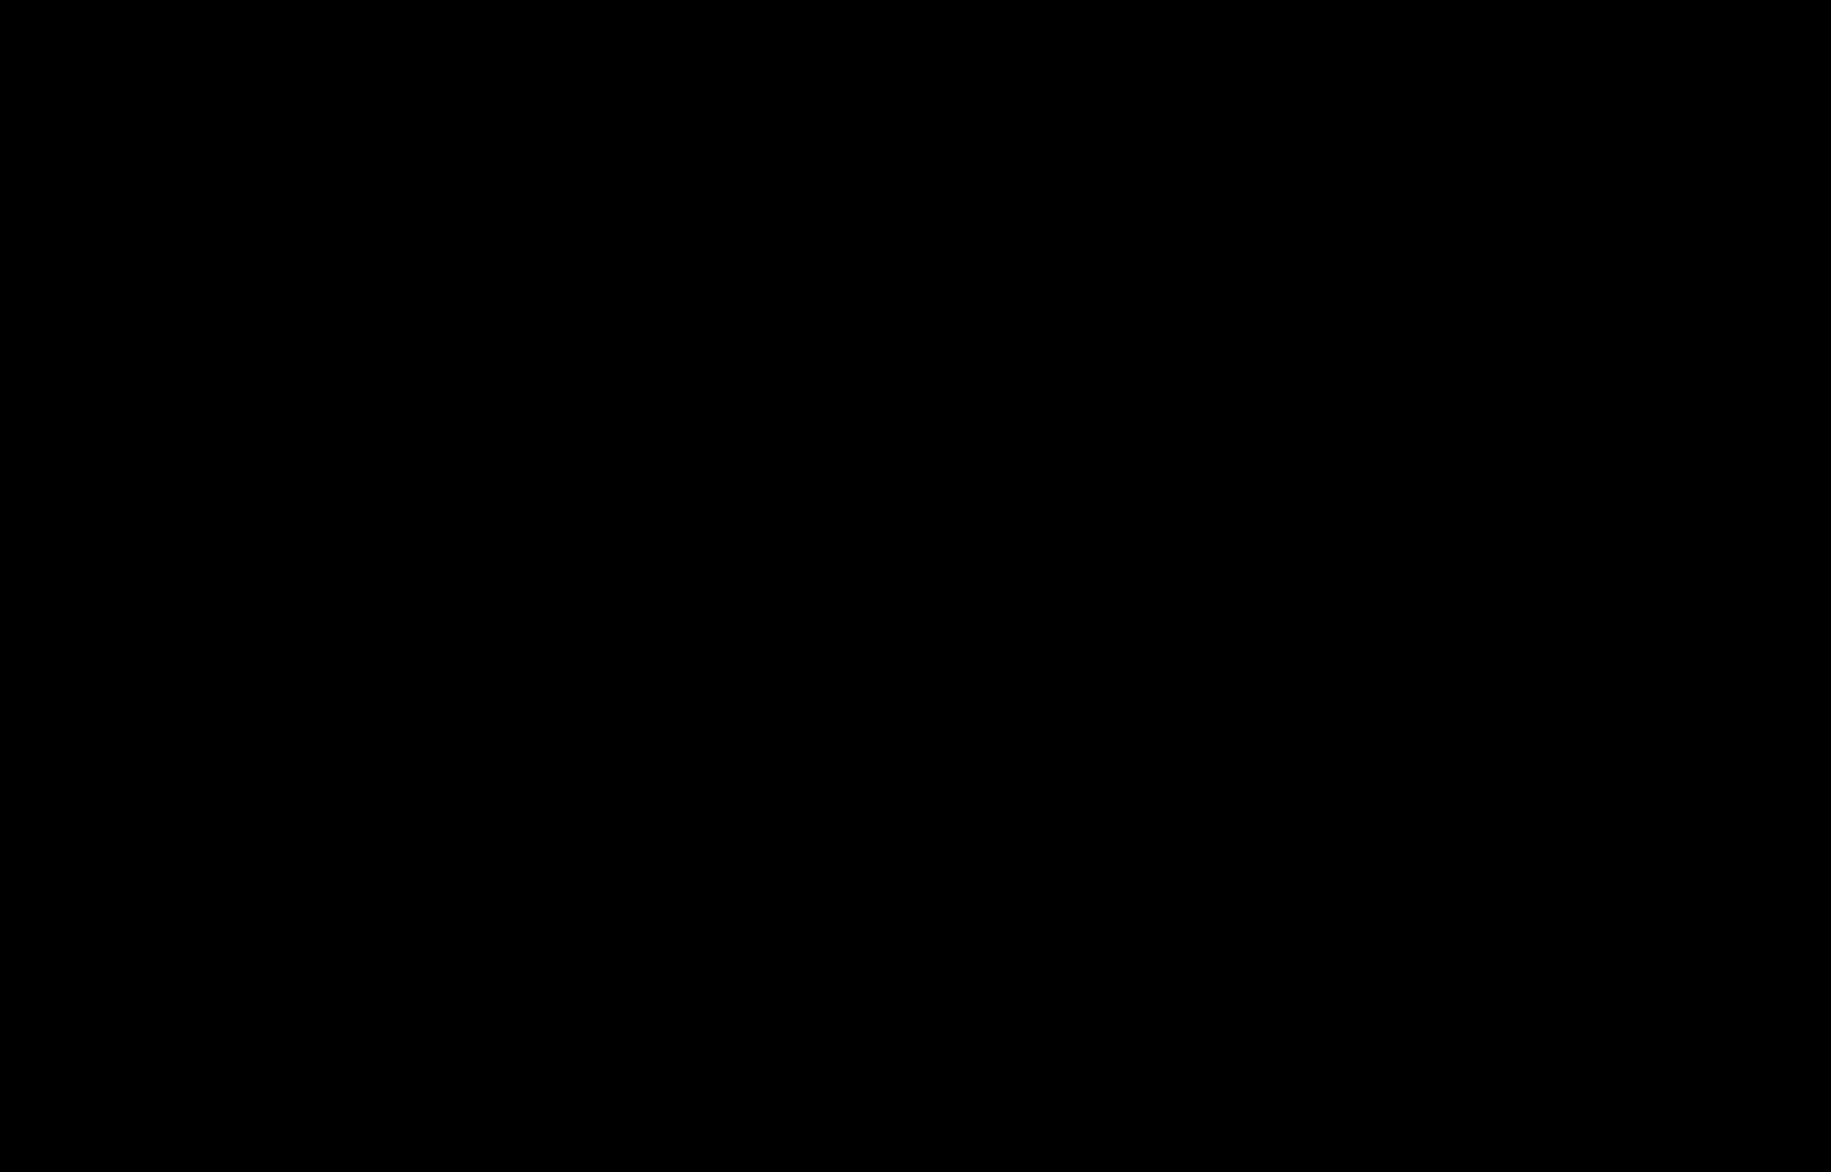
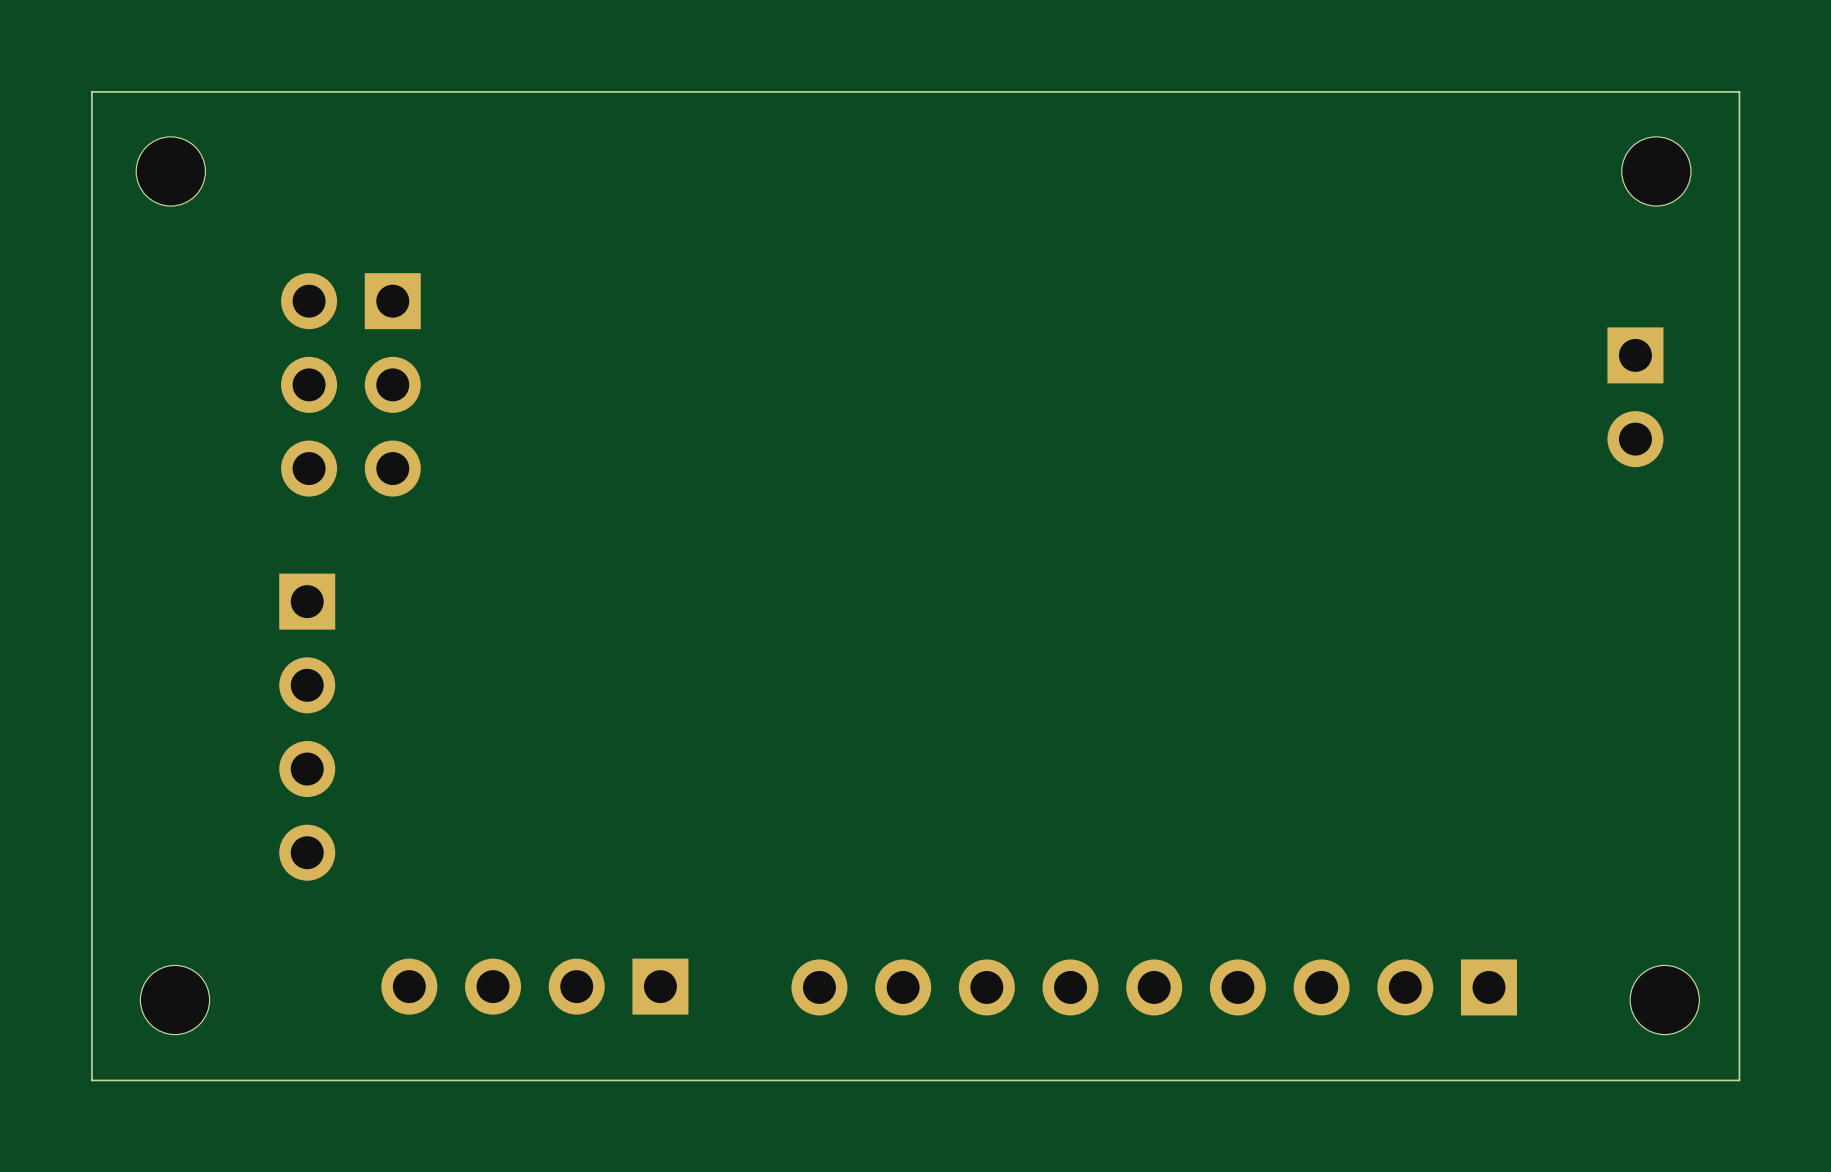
board edge: none -> (1739, 91) (91, 91) (91, 1080) (1739, 1080) (1739, 91)
part: none -> (170, 171)
part: none -> (1656, 171)
part: none -> (350, 384)
part: none -> (1635, 397)
part: none -> (307, 727)
part: none -> (534, 986)
part: none -> (1154, 987)
part: none -> (175, 1000)
part: none -> (1664, 1000)

